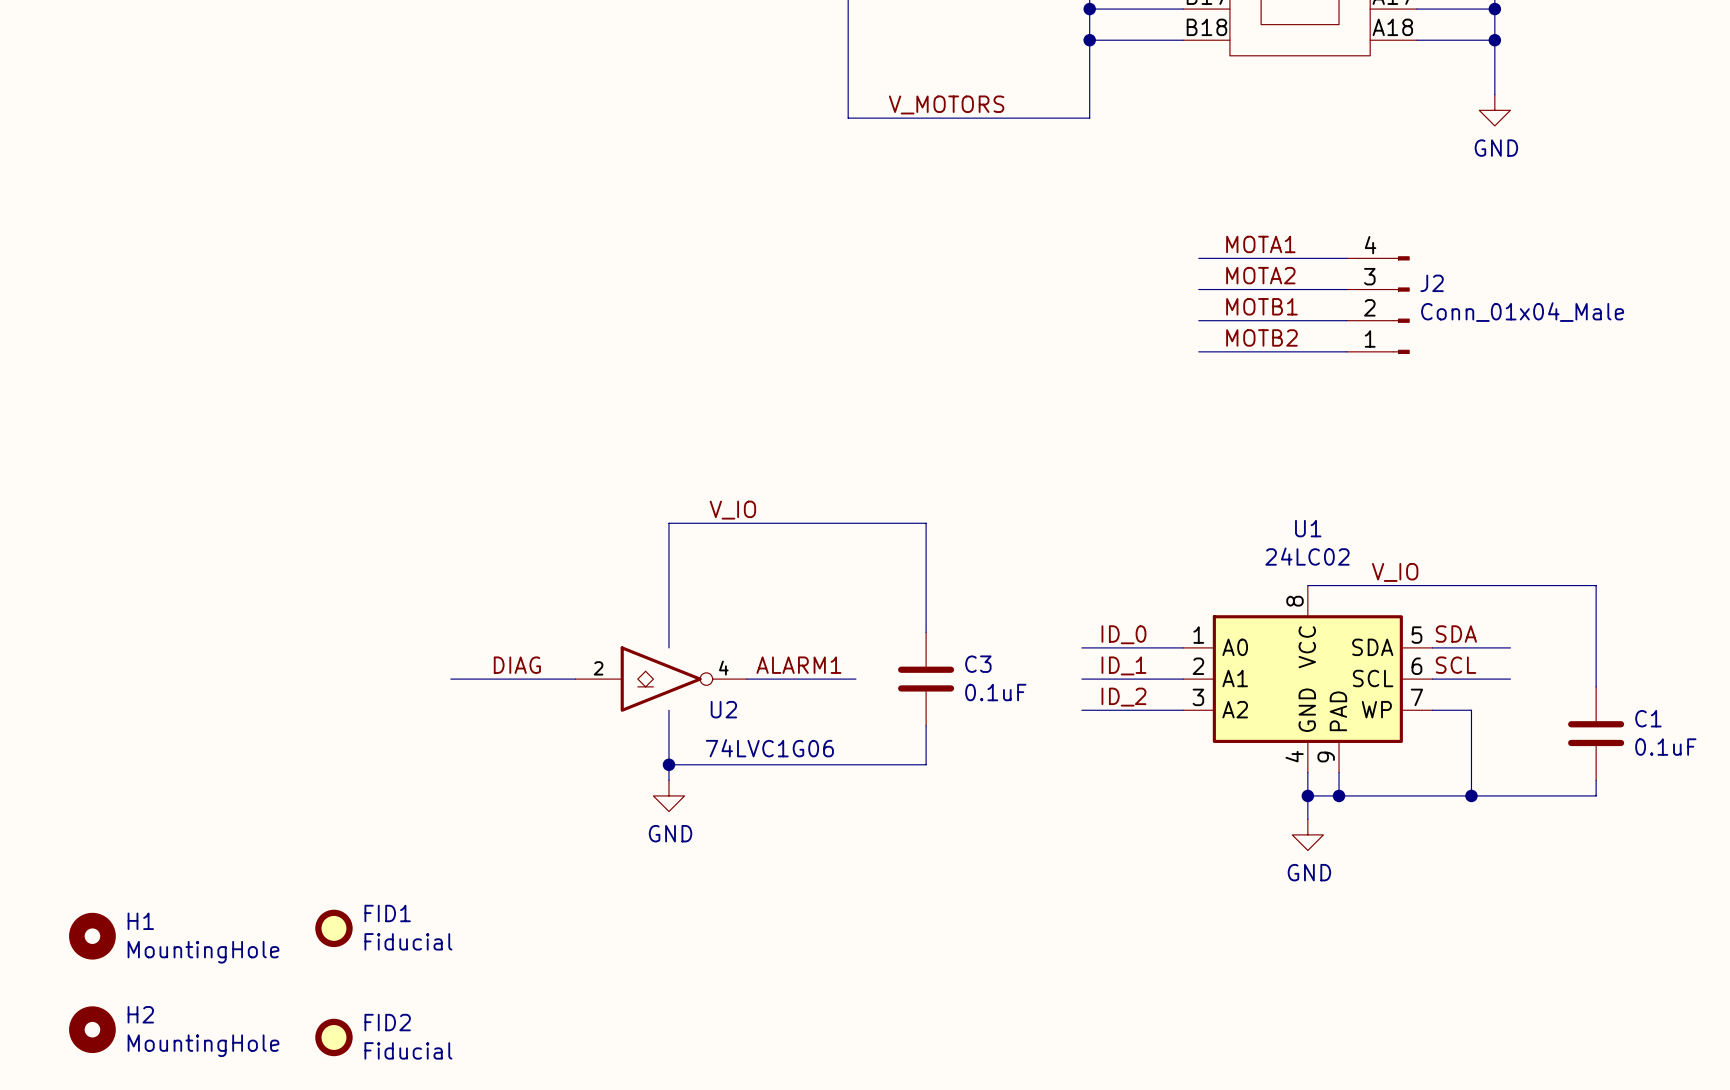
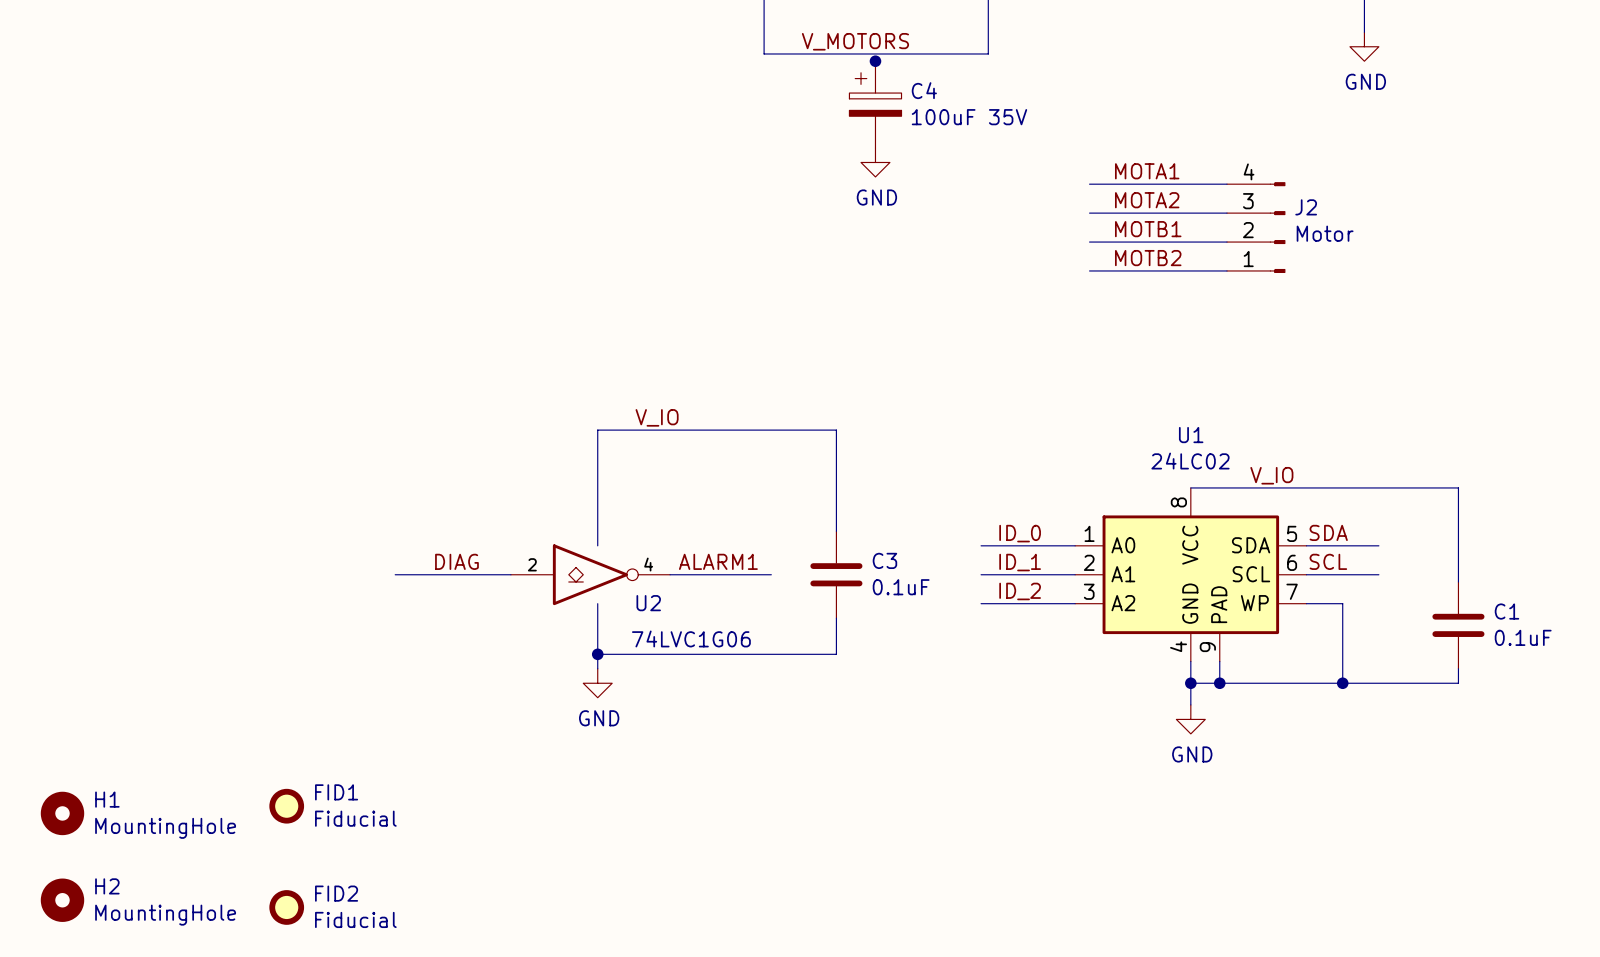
junction: none -> (875, 61)
C4: none -> 100uF 35V (875, 104)
power symbol: none -> GND (875, 162)
J2 value: Conn_01x04_Male (1522, 312) -> Motor (1325, 233)

